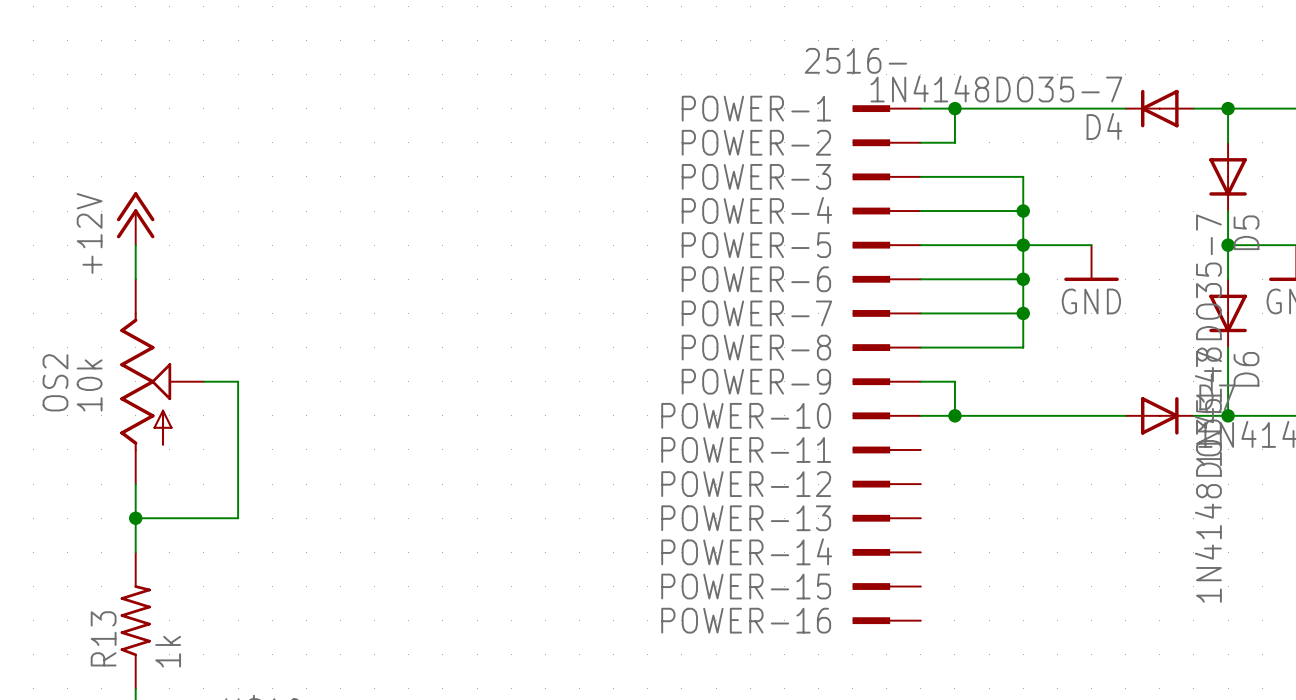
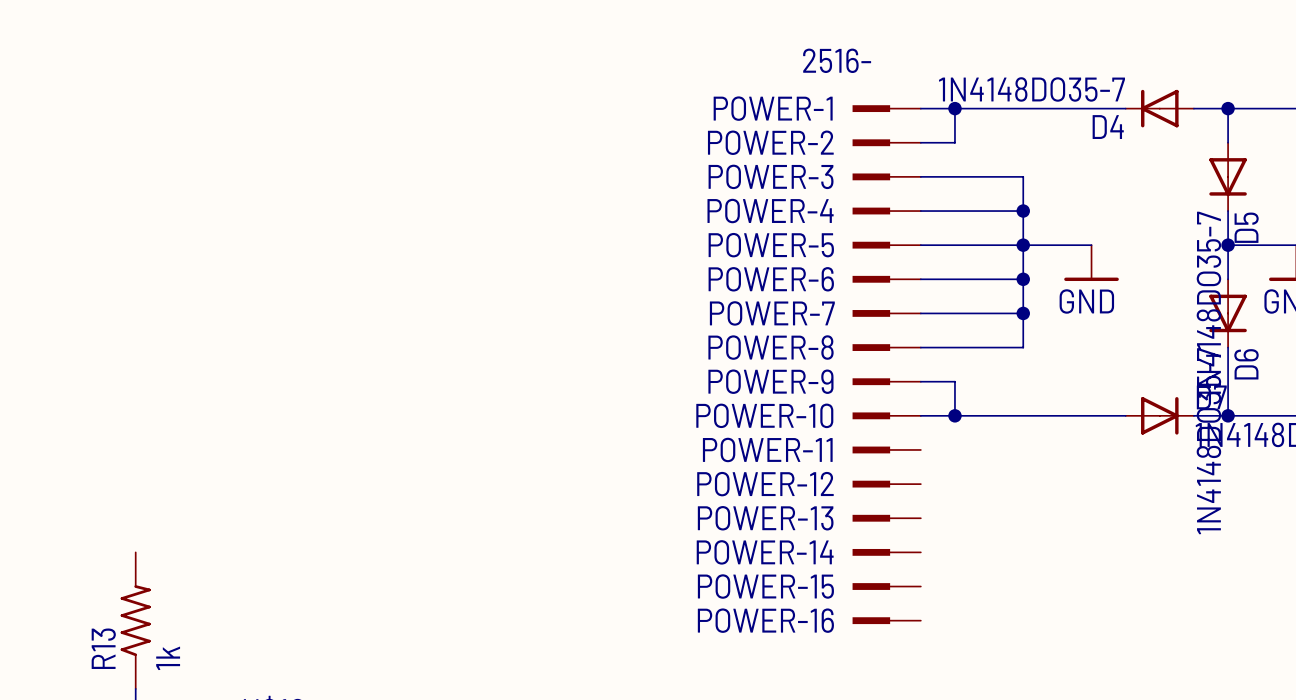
power symbol: +12V (135, 218) -> none
wire: (135, 245) (135, 279) -> none
OS2: 10k (162, 381) -> none
wire: (203, 381) (238, 381) (238, 518) (135, 518) -> none
wire: (135, 484) (135, 552) -> none
junction: (135, 518) -> none

